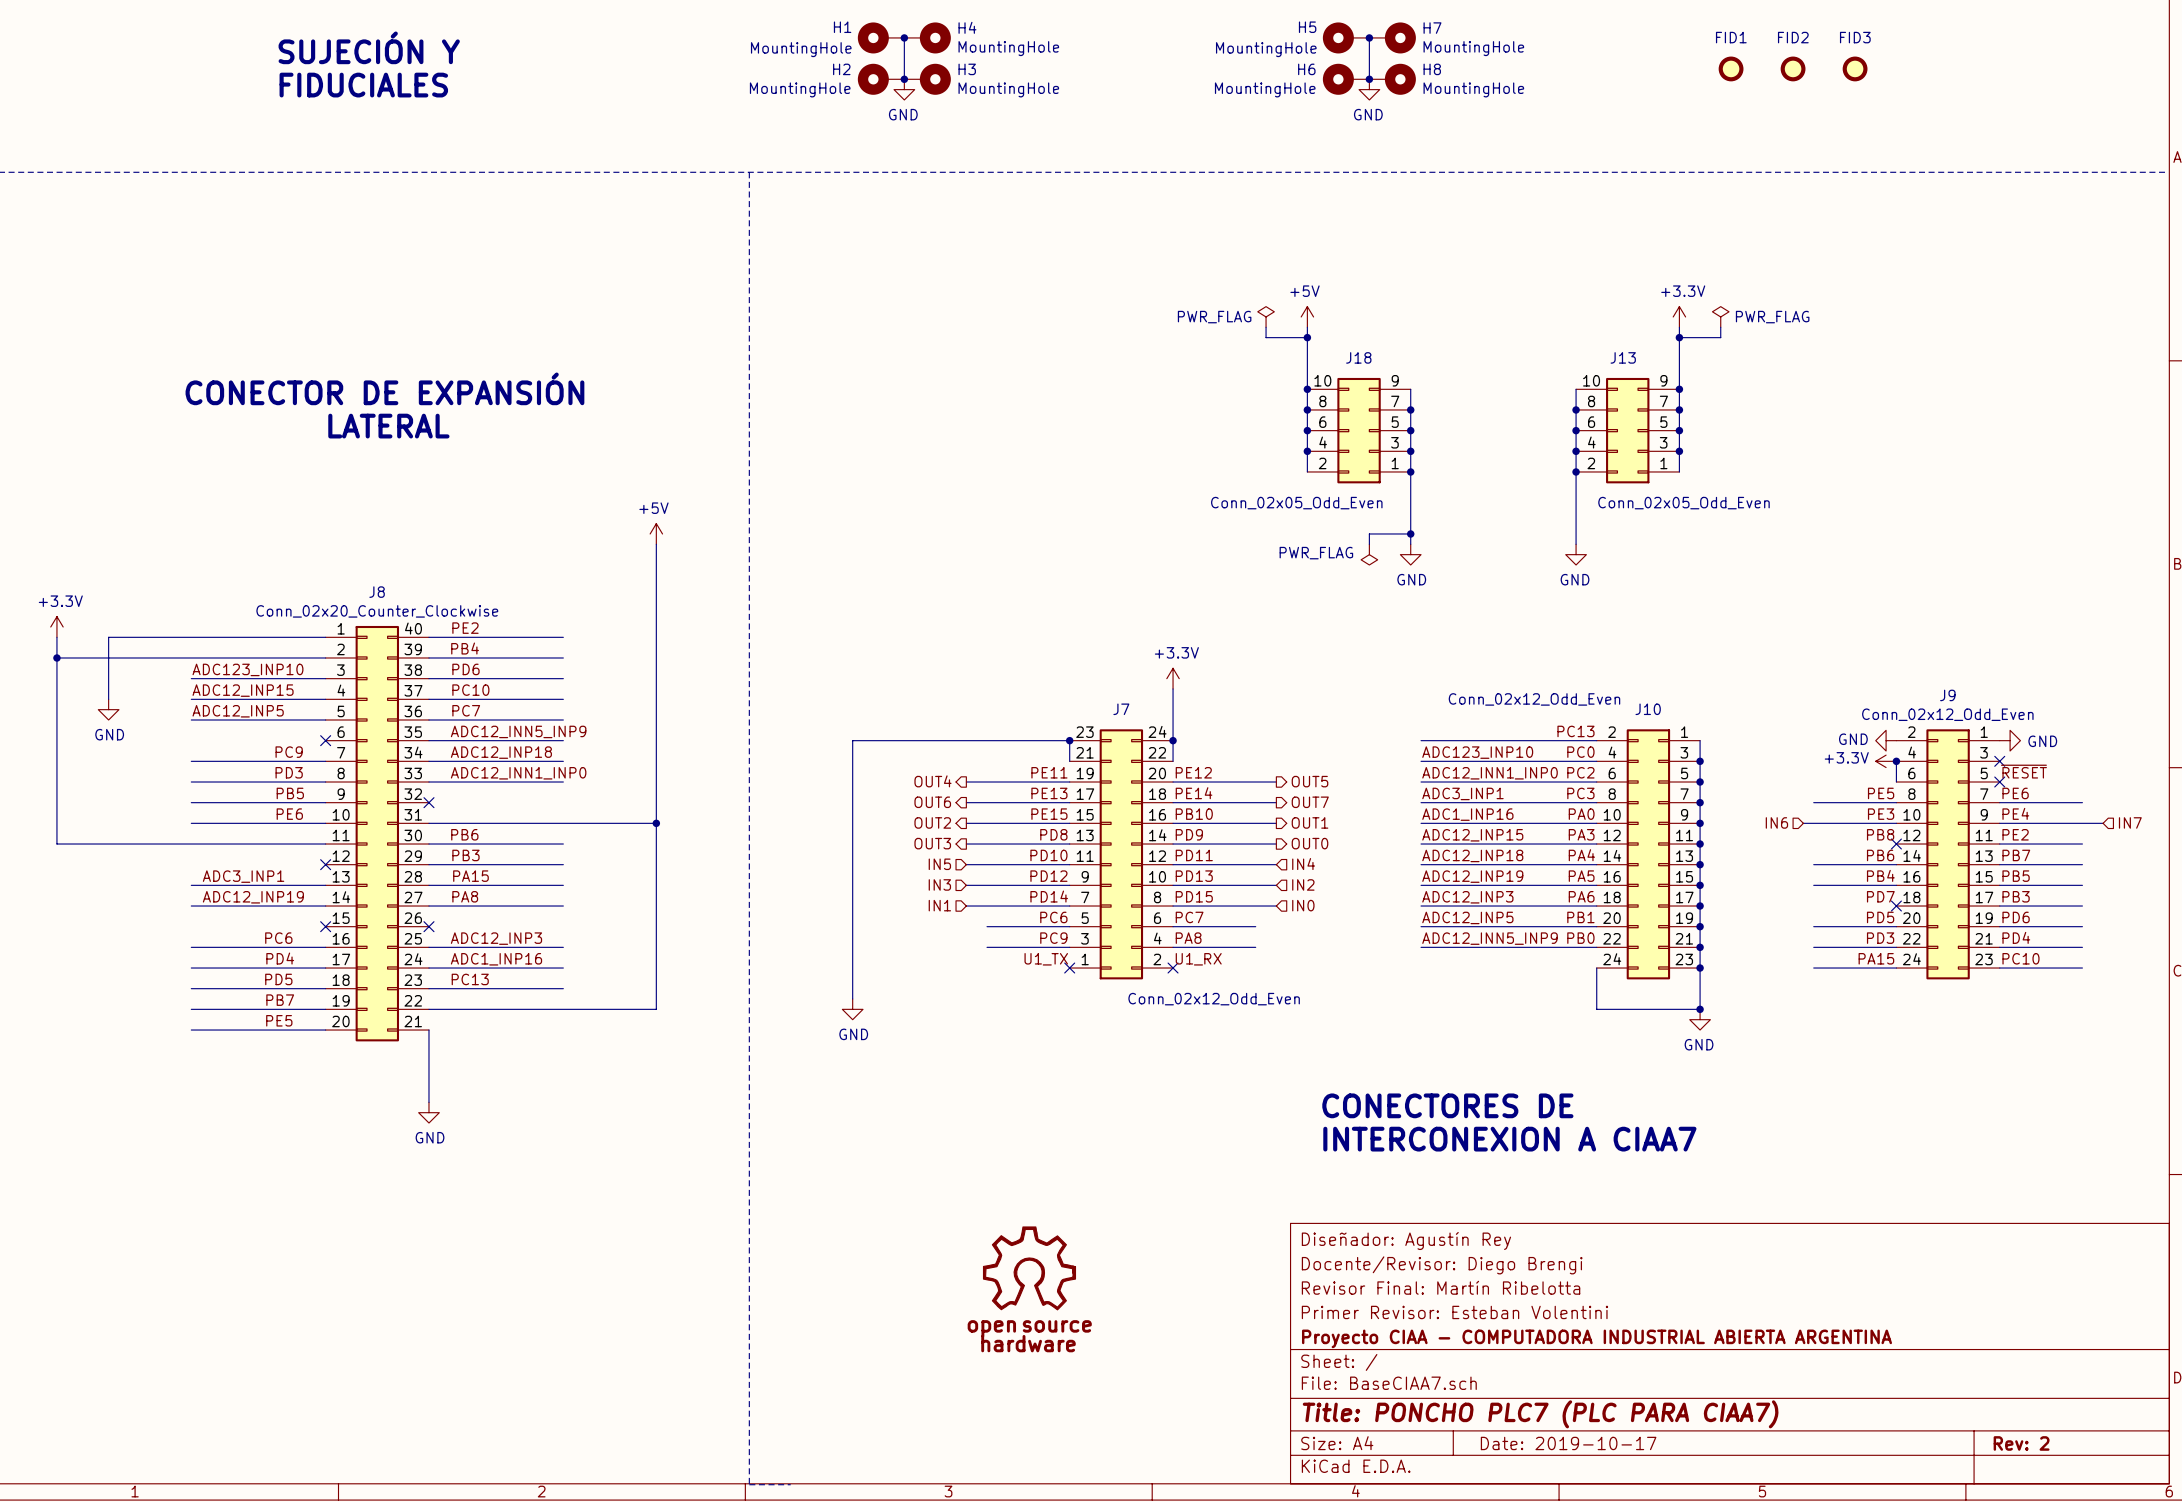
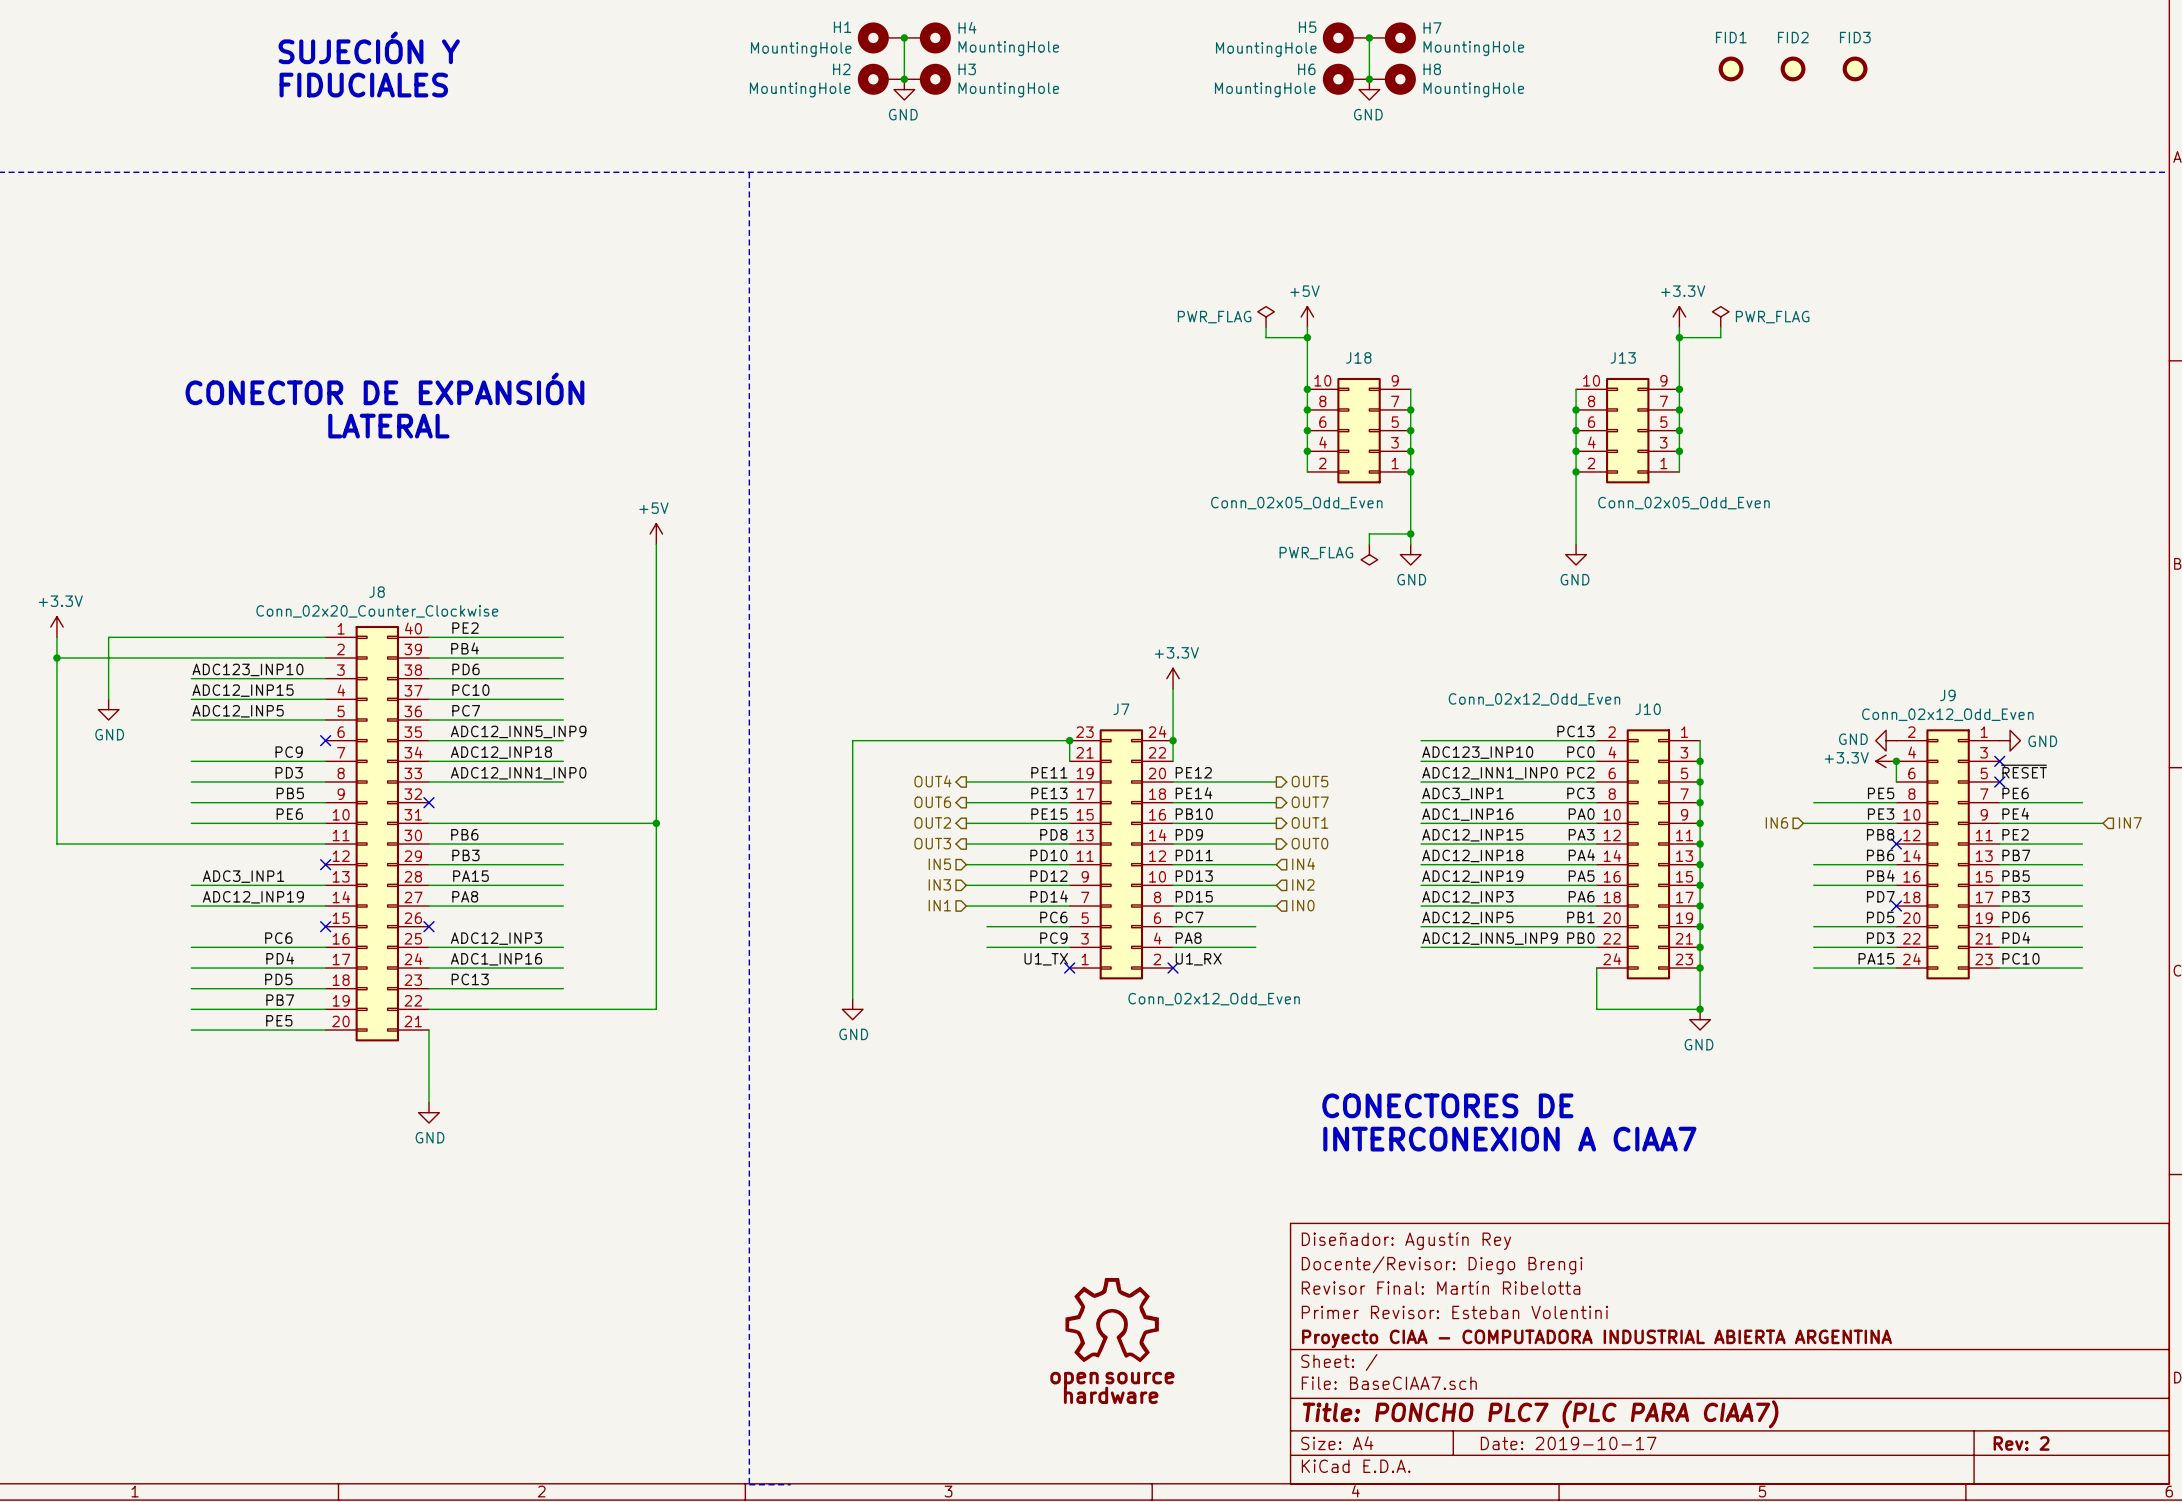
power symbol position: (1029, 1268) -> (1112, 1320)

